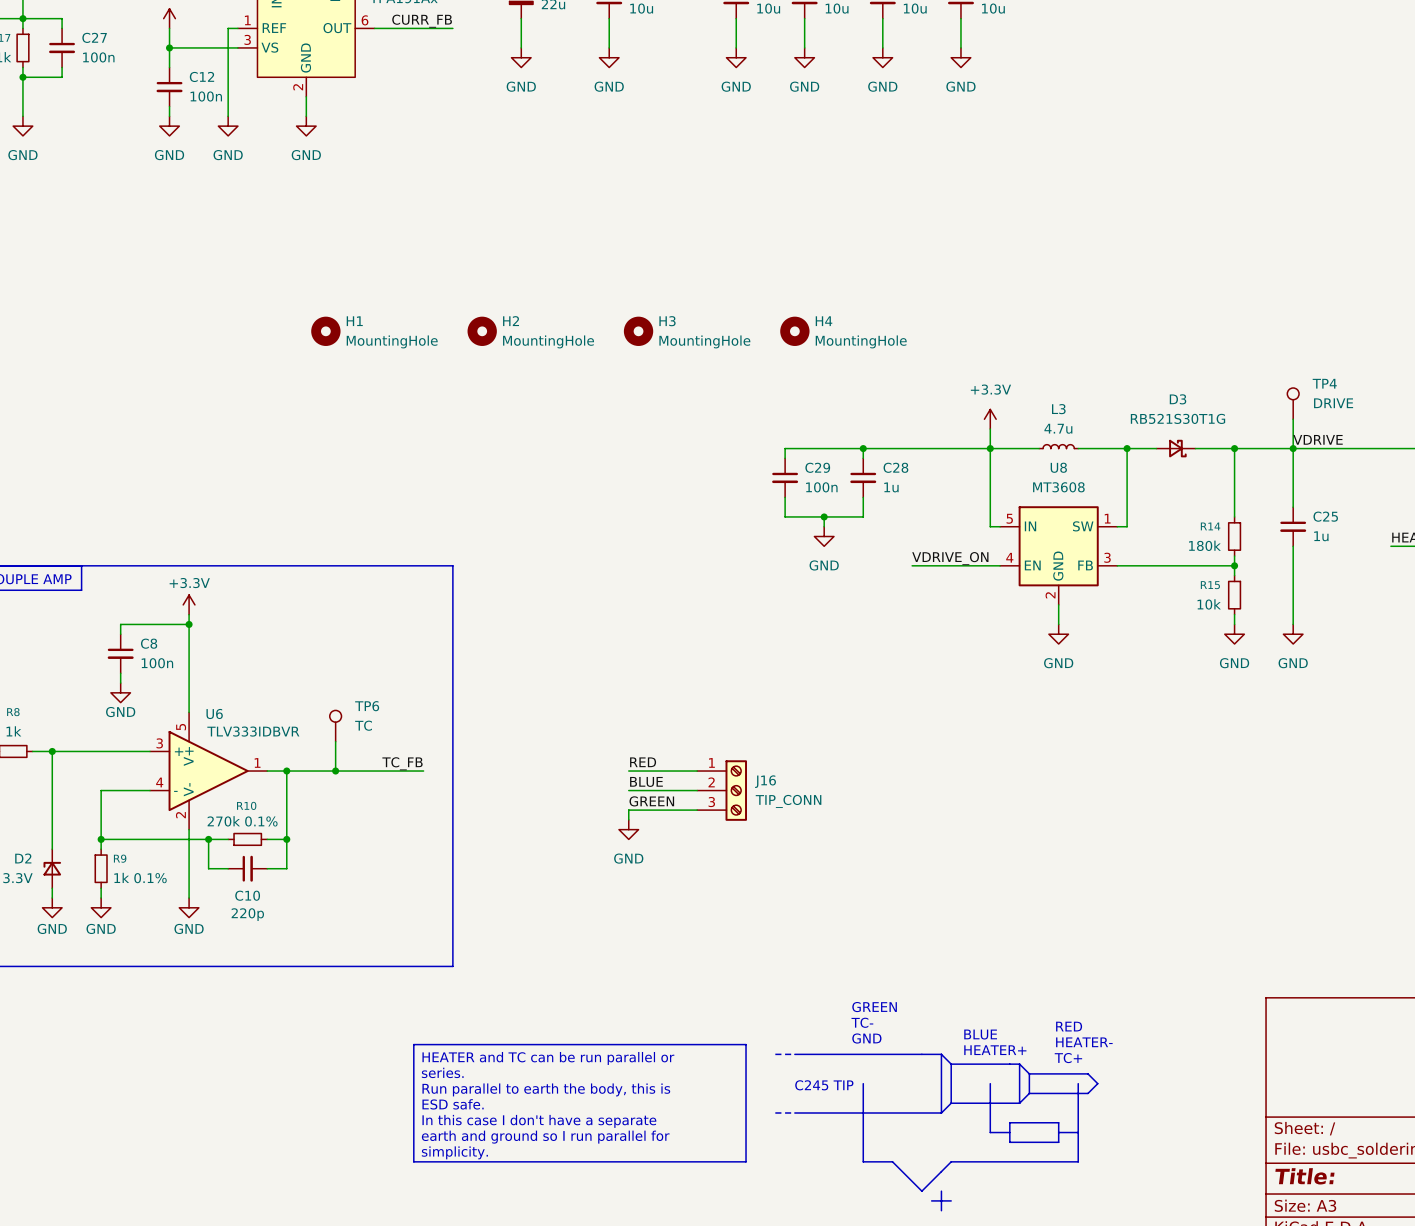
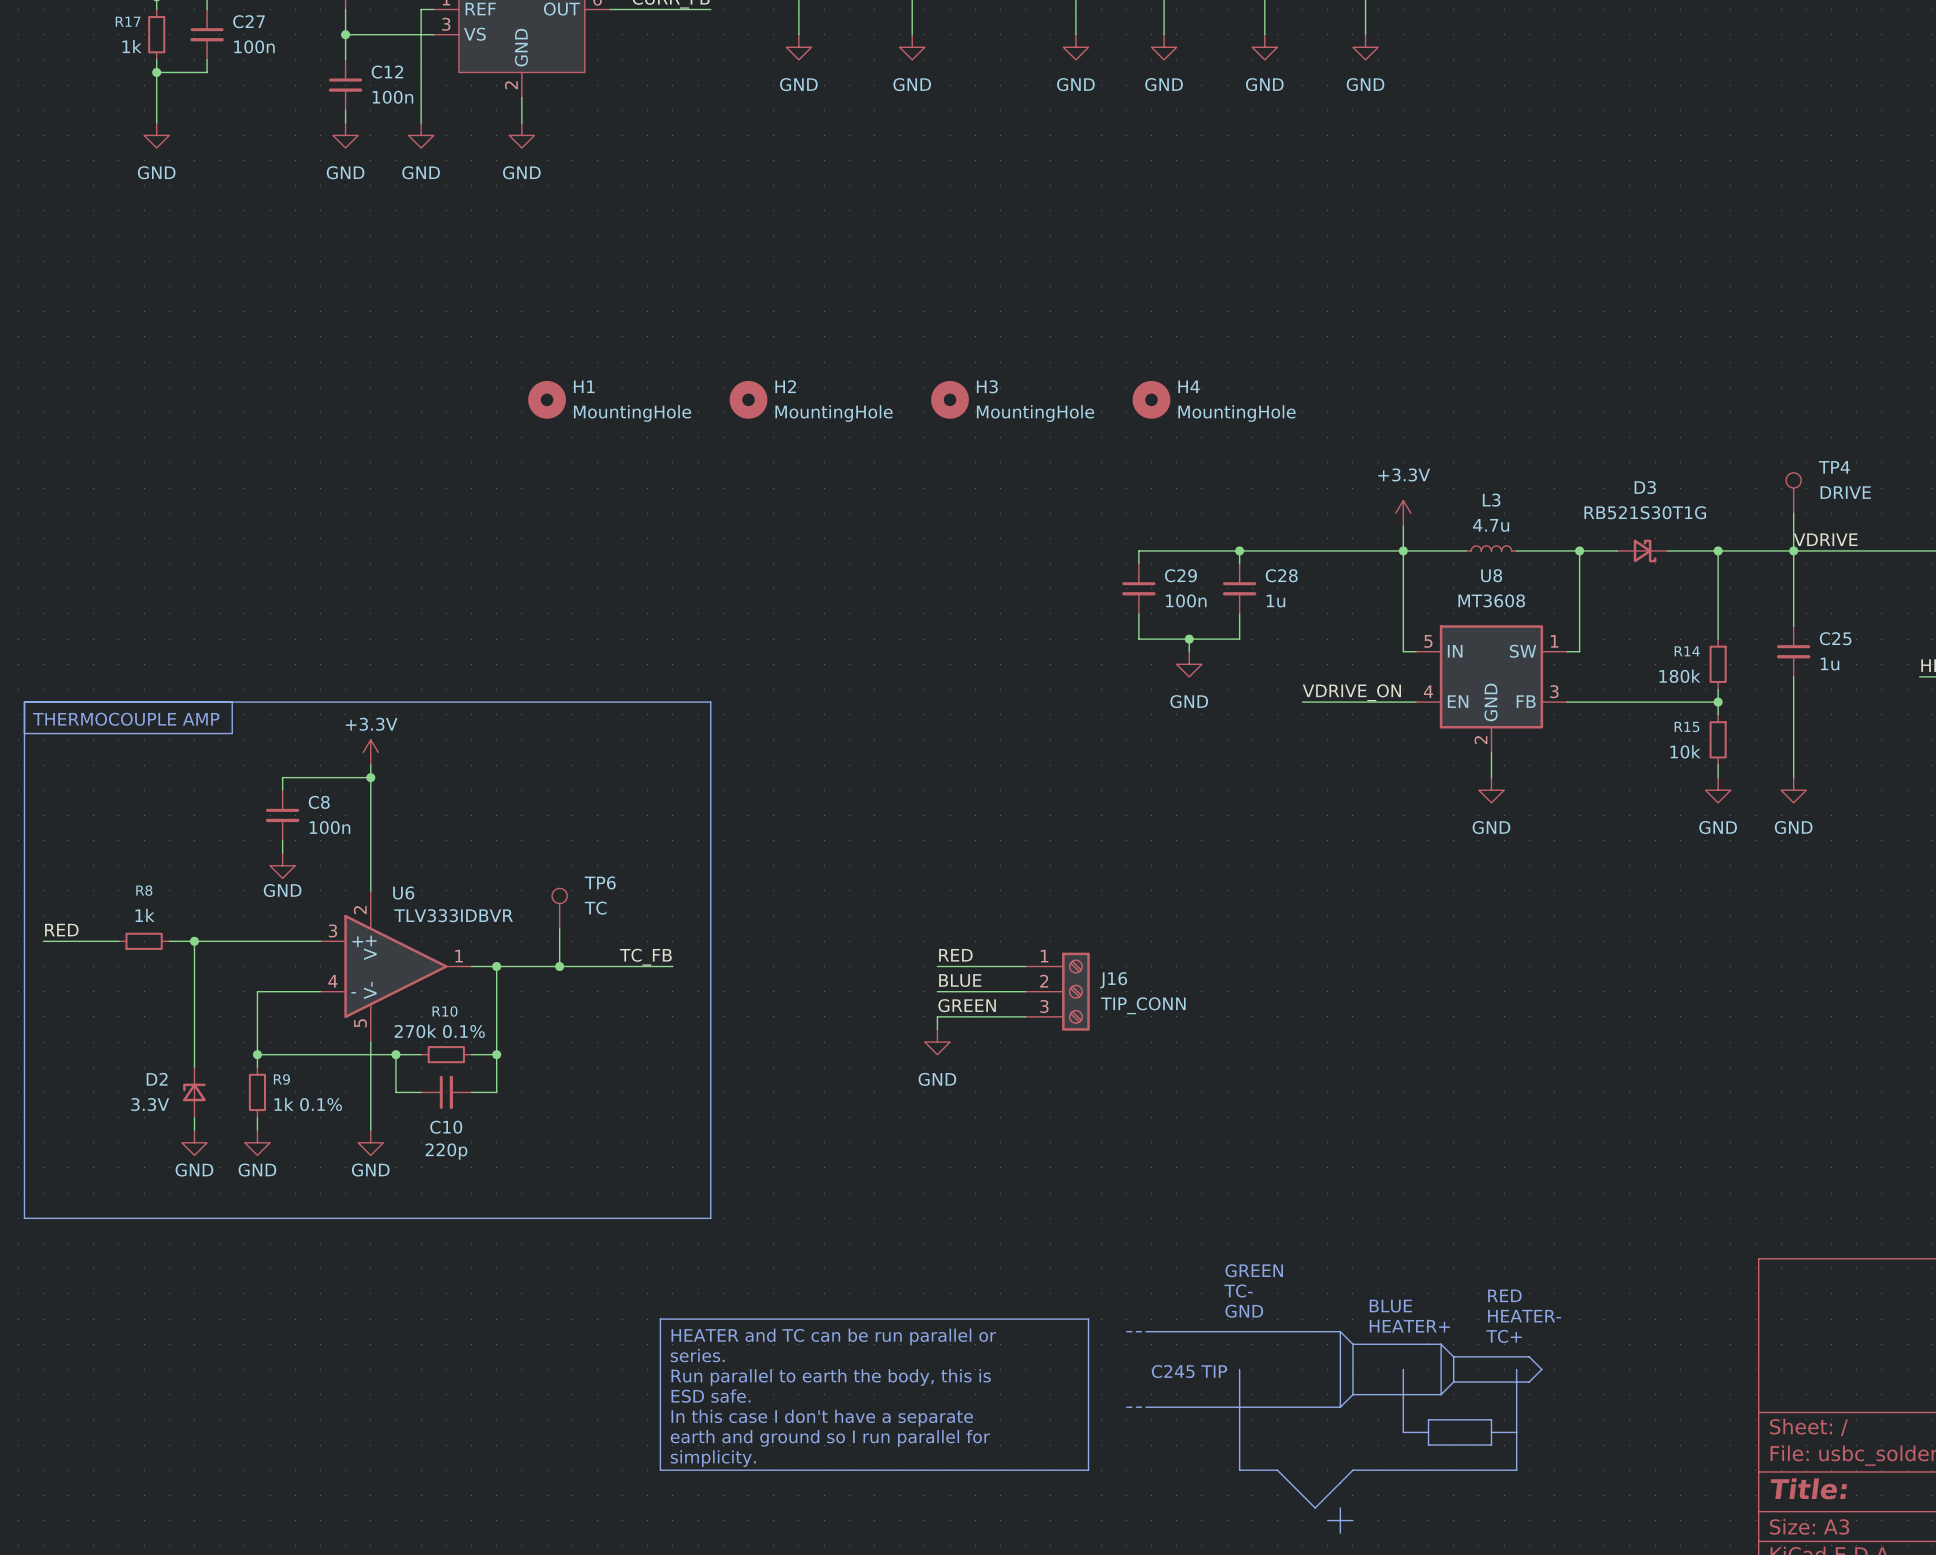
U6 pin number: 5 (181, 727) -> 2 (360, 910)
U6 pin number: 2 (180, 815) -> 5 (360, 1023)

